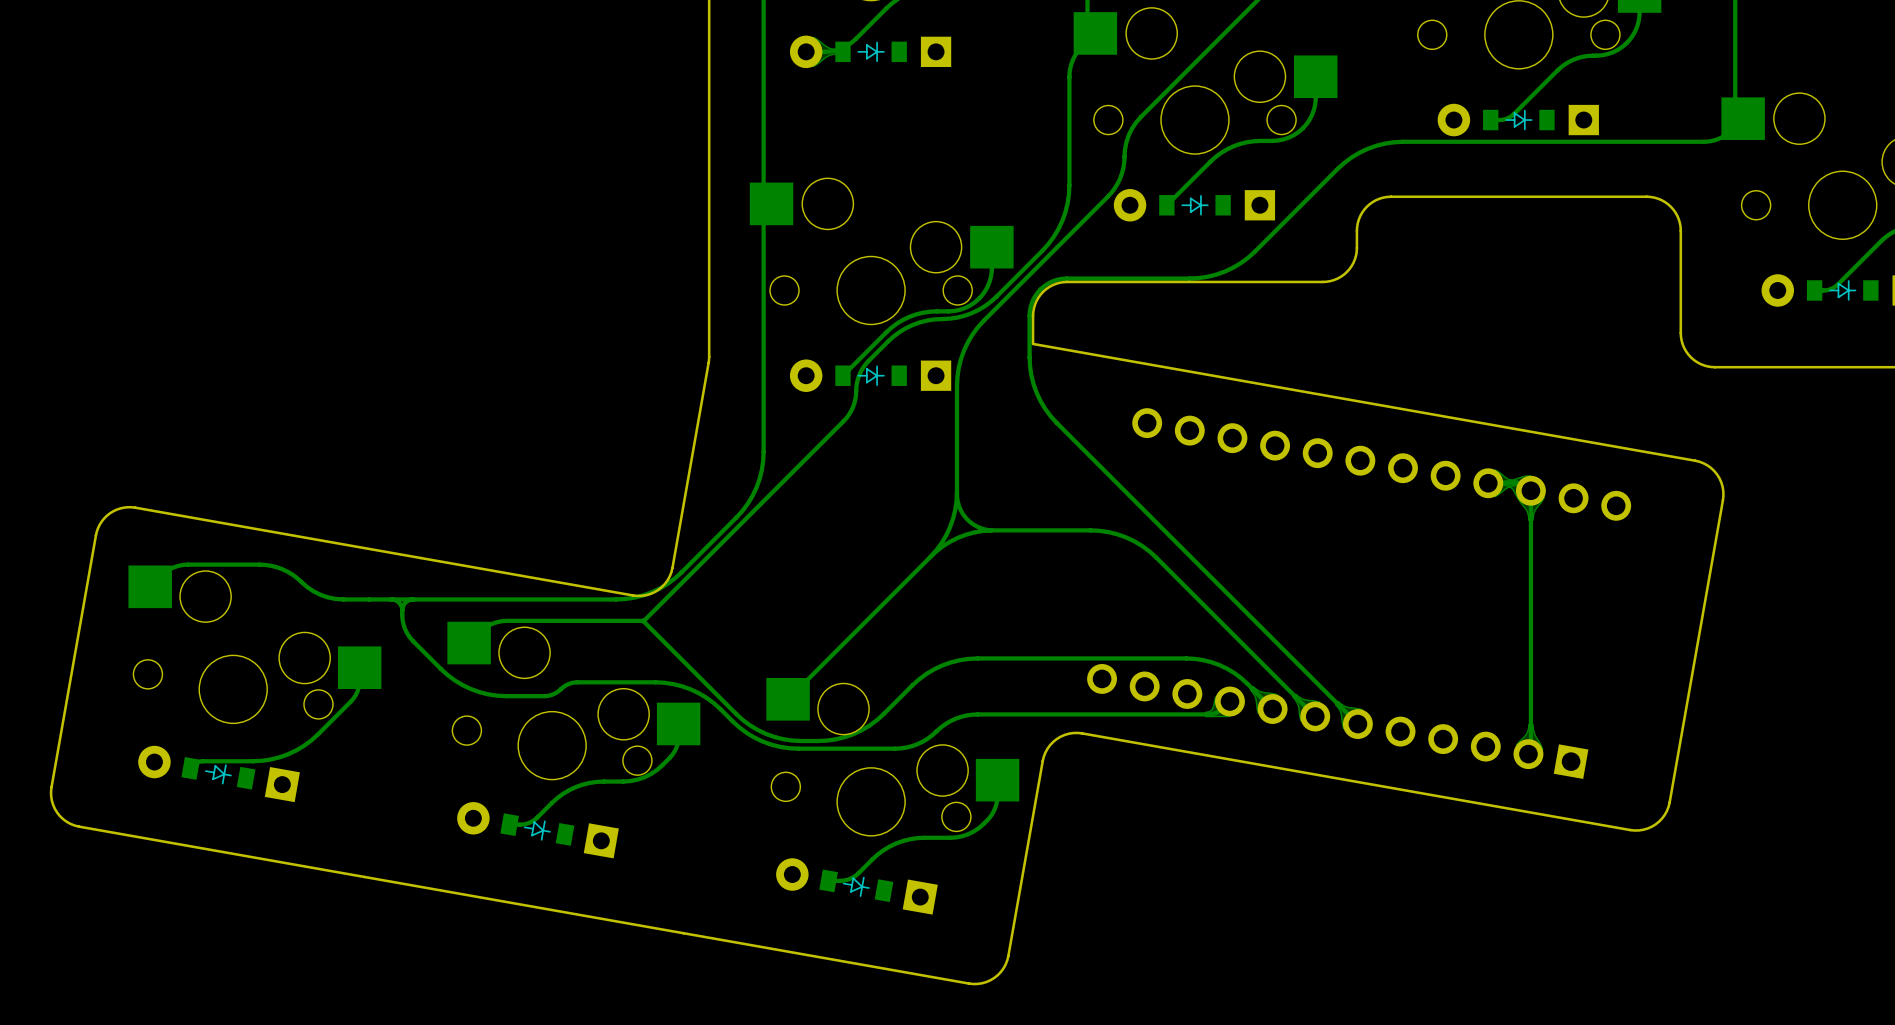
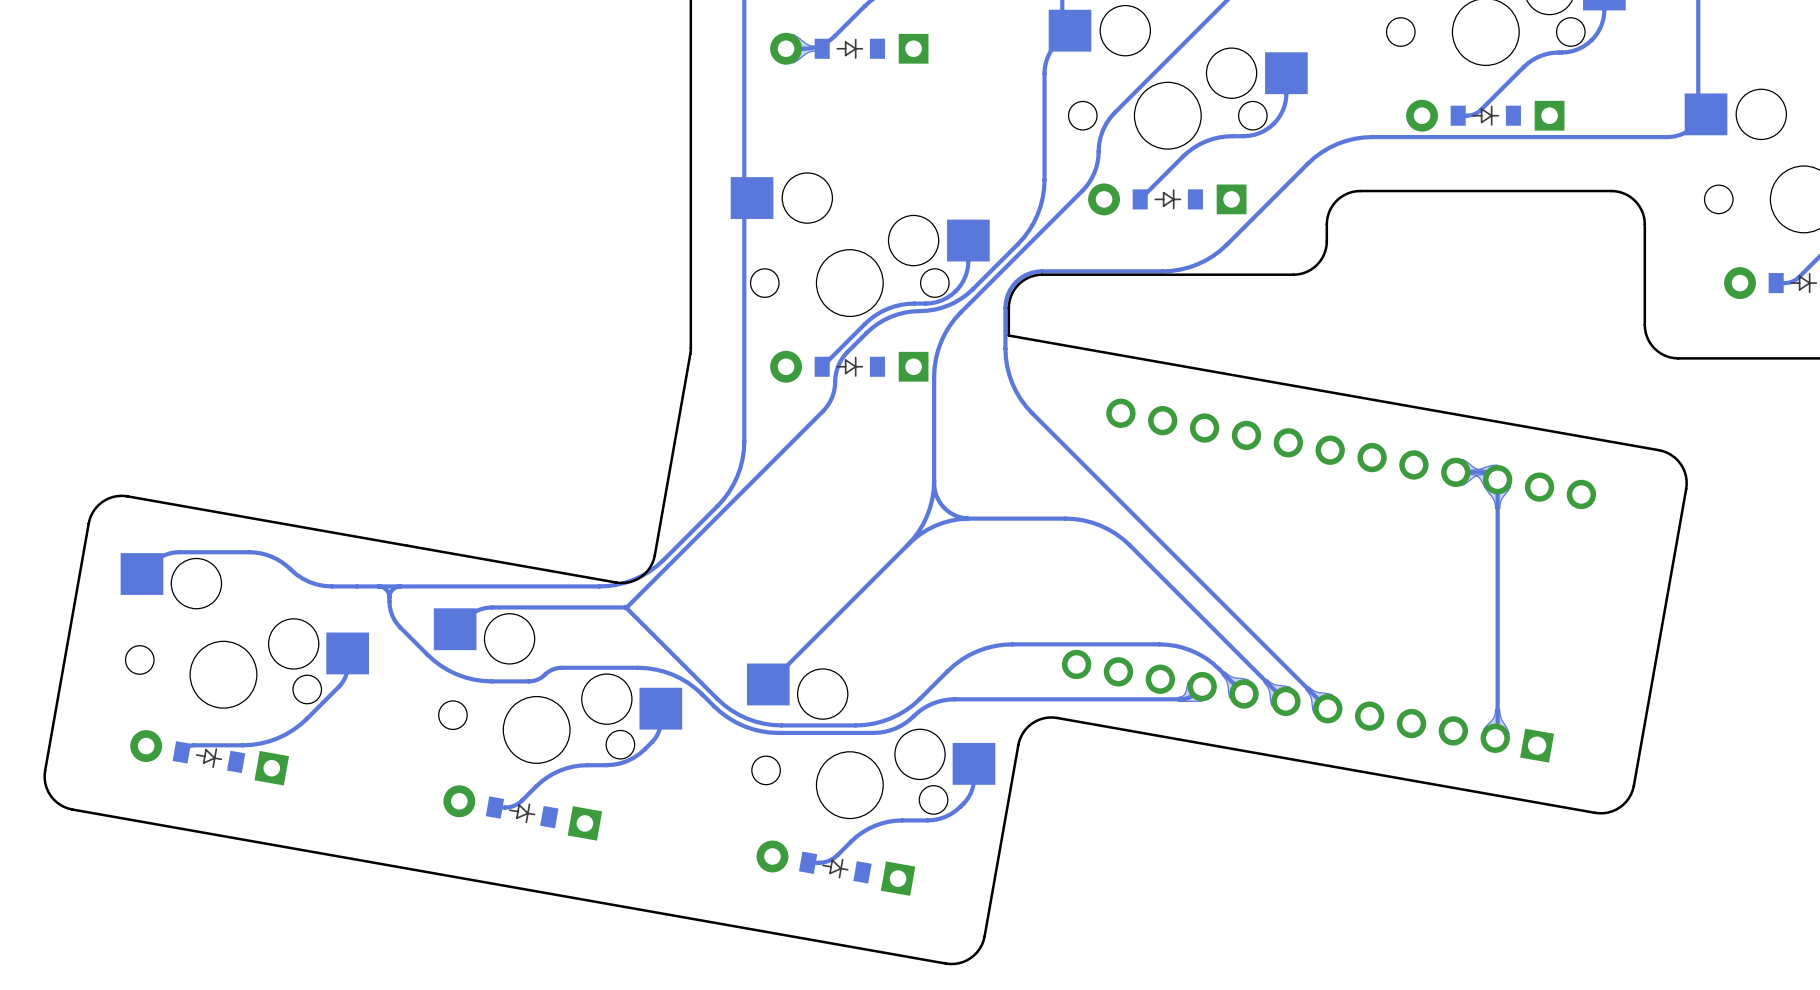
track: (1036, 658) (968, 658) (942, 665) (918, 679) (869, 725) (845, 737) (818, 741) -> (1012, 644) (985, 648) (961, 659) (913, 704) (890, 718) (864, 724) (797, 725)

